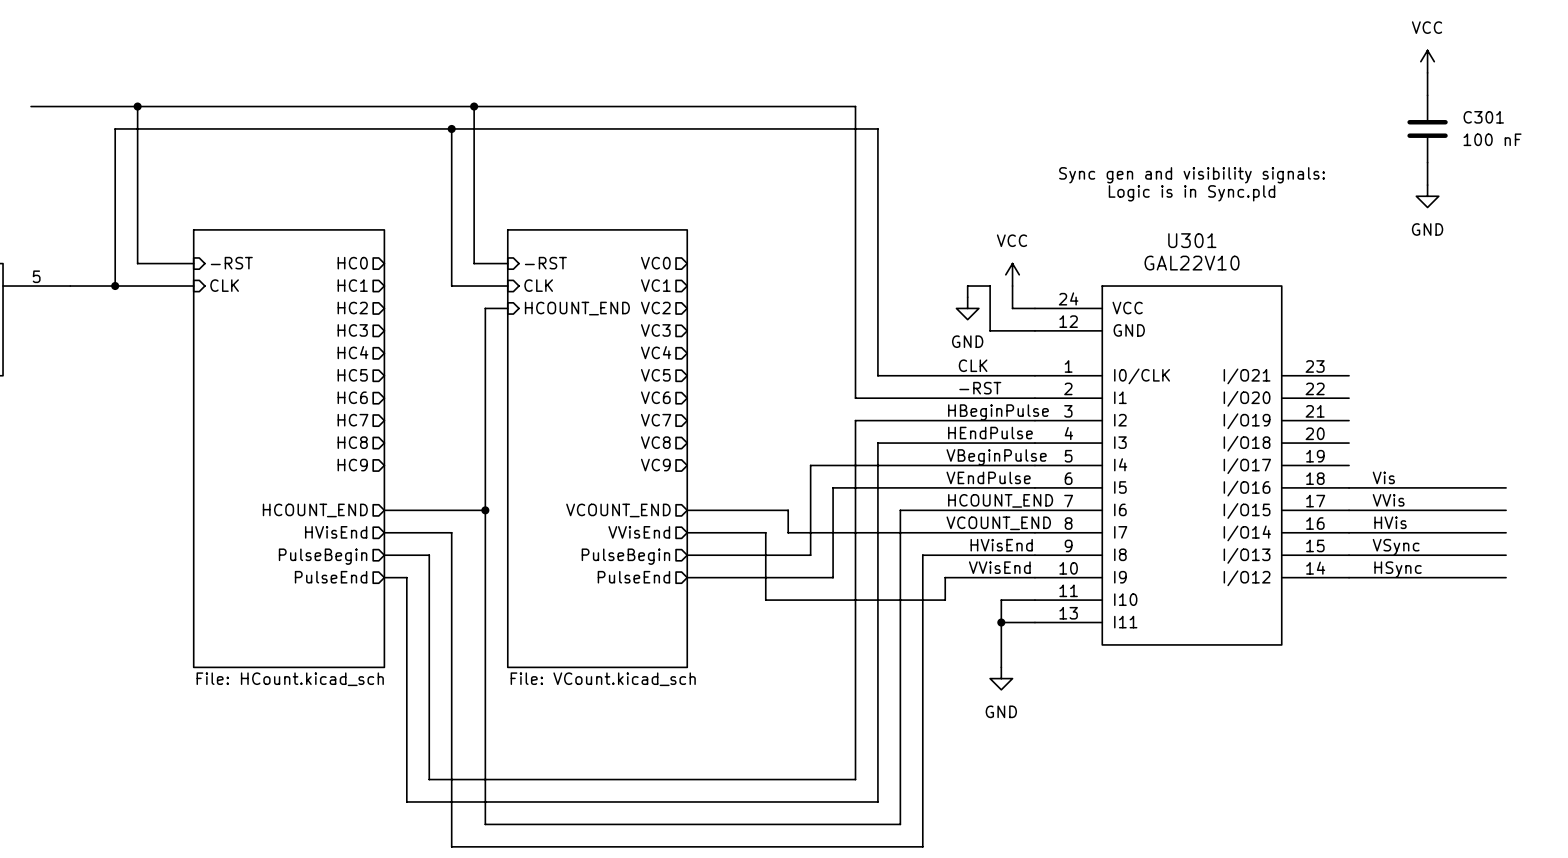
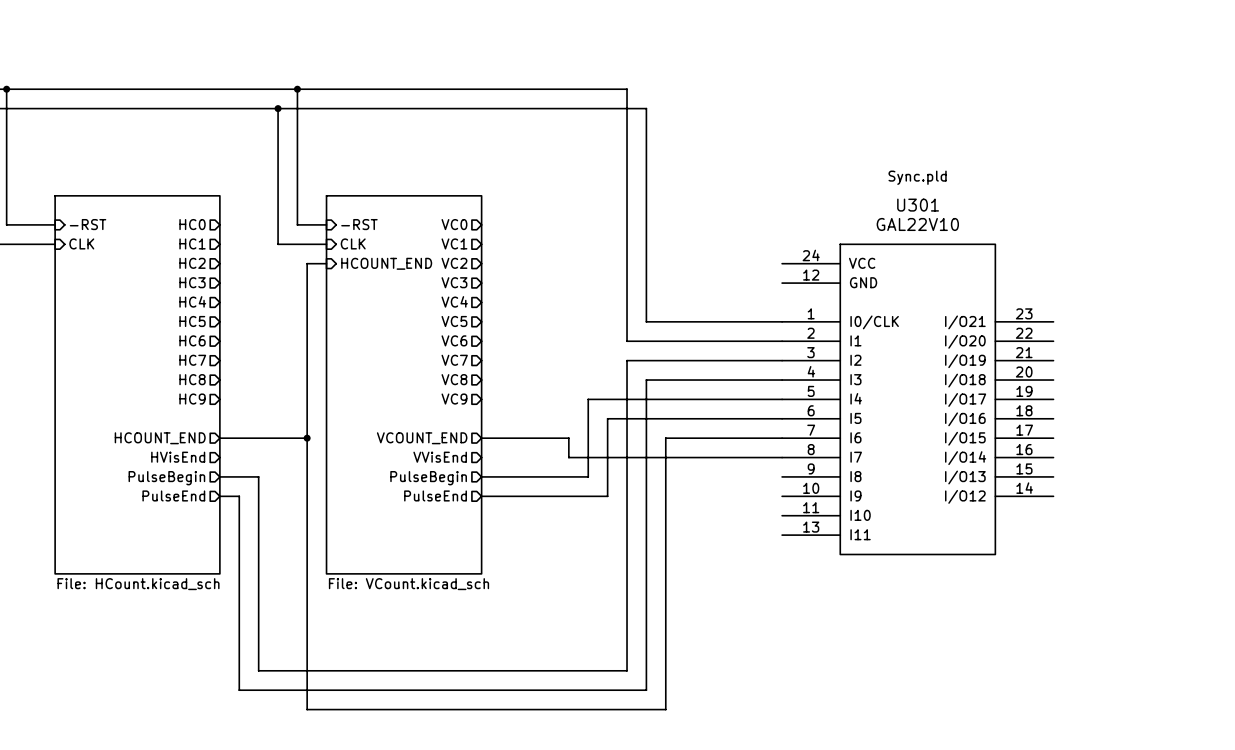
power symbol: VCC (1427, 61) -> none
wire: (1427, 72) (1427, 95) -> none
C301: 100 nF (1427, 128) -> none
wire: (1427, 162) (1427, 185) -> none
text: Sync gen and visibility signals: (1192, 175) -> none
text: Logic is in Sync.pld (1192, 193) -> none
power symbol: GND (1427, 196) -> none
text: none -> Sync.pld (917, 177)
power symbol: VCC (1012, 274) -> none
wire: (1012, 286) (1012, 308) (1034, 308) -> none
wire: (967, 297) (967, 286) (990, 286) (990, 330) (1034, 330) -> none
power symbol: GND (967, 308) -> none
label: CLK (973, 365) -> none
label: -RST (980, 388) -> none
label: HBeginPulse (998, 412) -> none
label: HEndPulse (990, 433) -> none
label: VBeginPulse (996, 457) -> none
label: VEndPulse (988, 477) -> none
label: Vis (1383, 477) -> none
wire: (1349, 487) (1506, 487) -> none
label: HCOUNT_END (1000, 500) -> none
label: VVis (1388, 500) -> none
wire: (1349, 510) (1506, 510) -> none
label: HVis (1390, 522) -> none
label: VCOUNT_END (998, 523) -> none
wire: (384, 532) (451, 532) (451, 846) (922, 846) (922, 555) (1034, 555) -> none
wire: (687, 532) (765, 532) (765, 600) (945, 600) (945, 577) (1034, 577) -> none
wire: (1349, 532) (1506, 532) -> none
label: HVisEnd (1001, 545) -> none
label: VSync (1396, 547) -> none
wire: (1349, 555) (1506, 555) -> none
label: VVisEnd (999, 567) -> none
label: HSync (1398, 569) -> none
wire: (1349, 577) (1506, 577) -> none
wire: (1034, 600) (1001, 600) (1001, 667) -> none
wire: (1001, 622) (1034, 622) -> none
junction: (1001, 622) -> none
power symbol: GND (1001, 678) -> none

